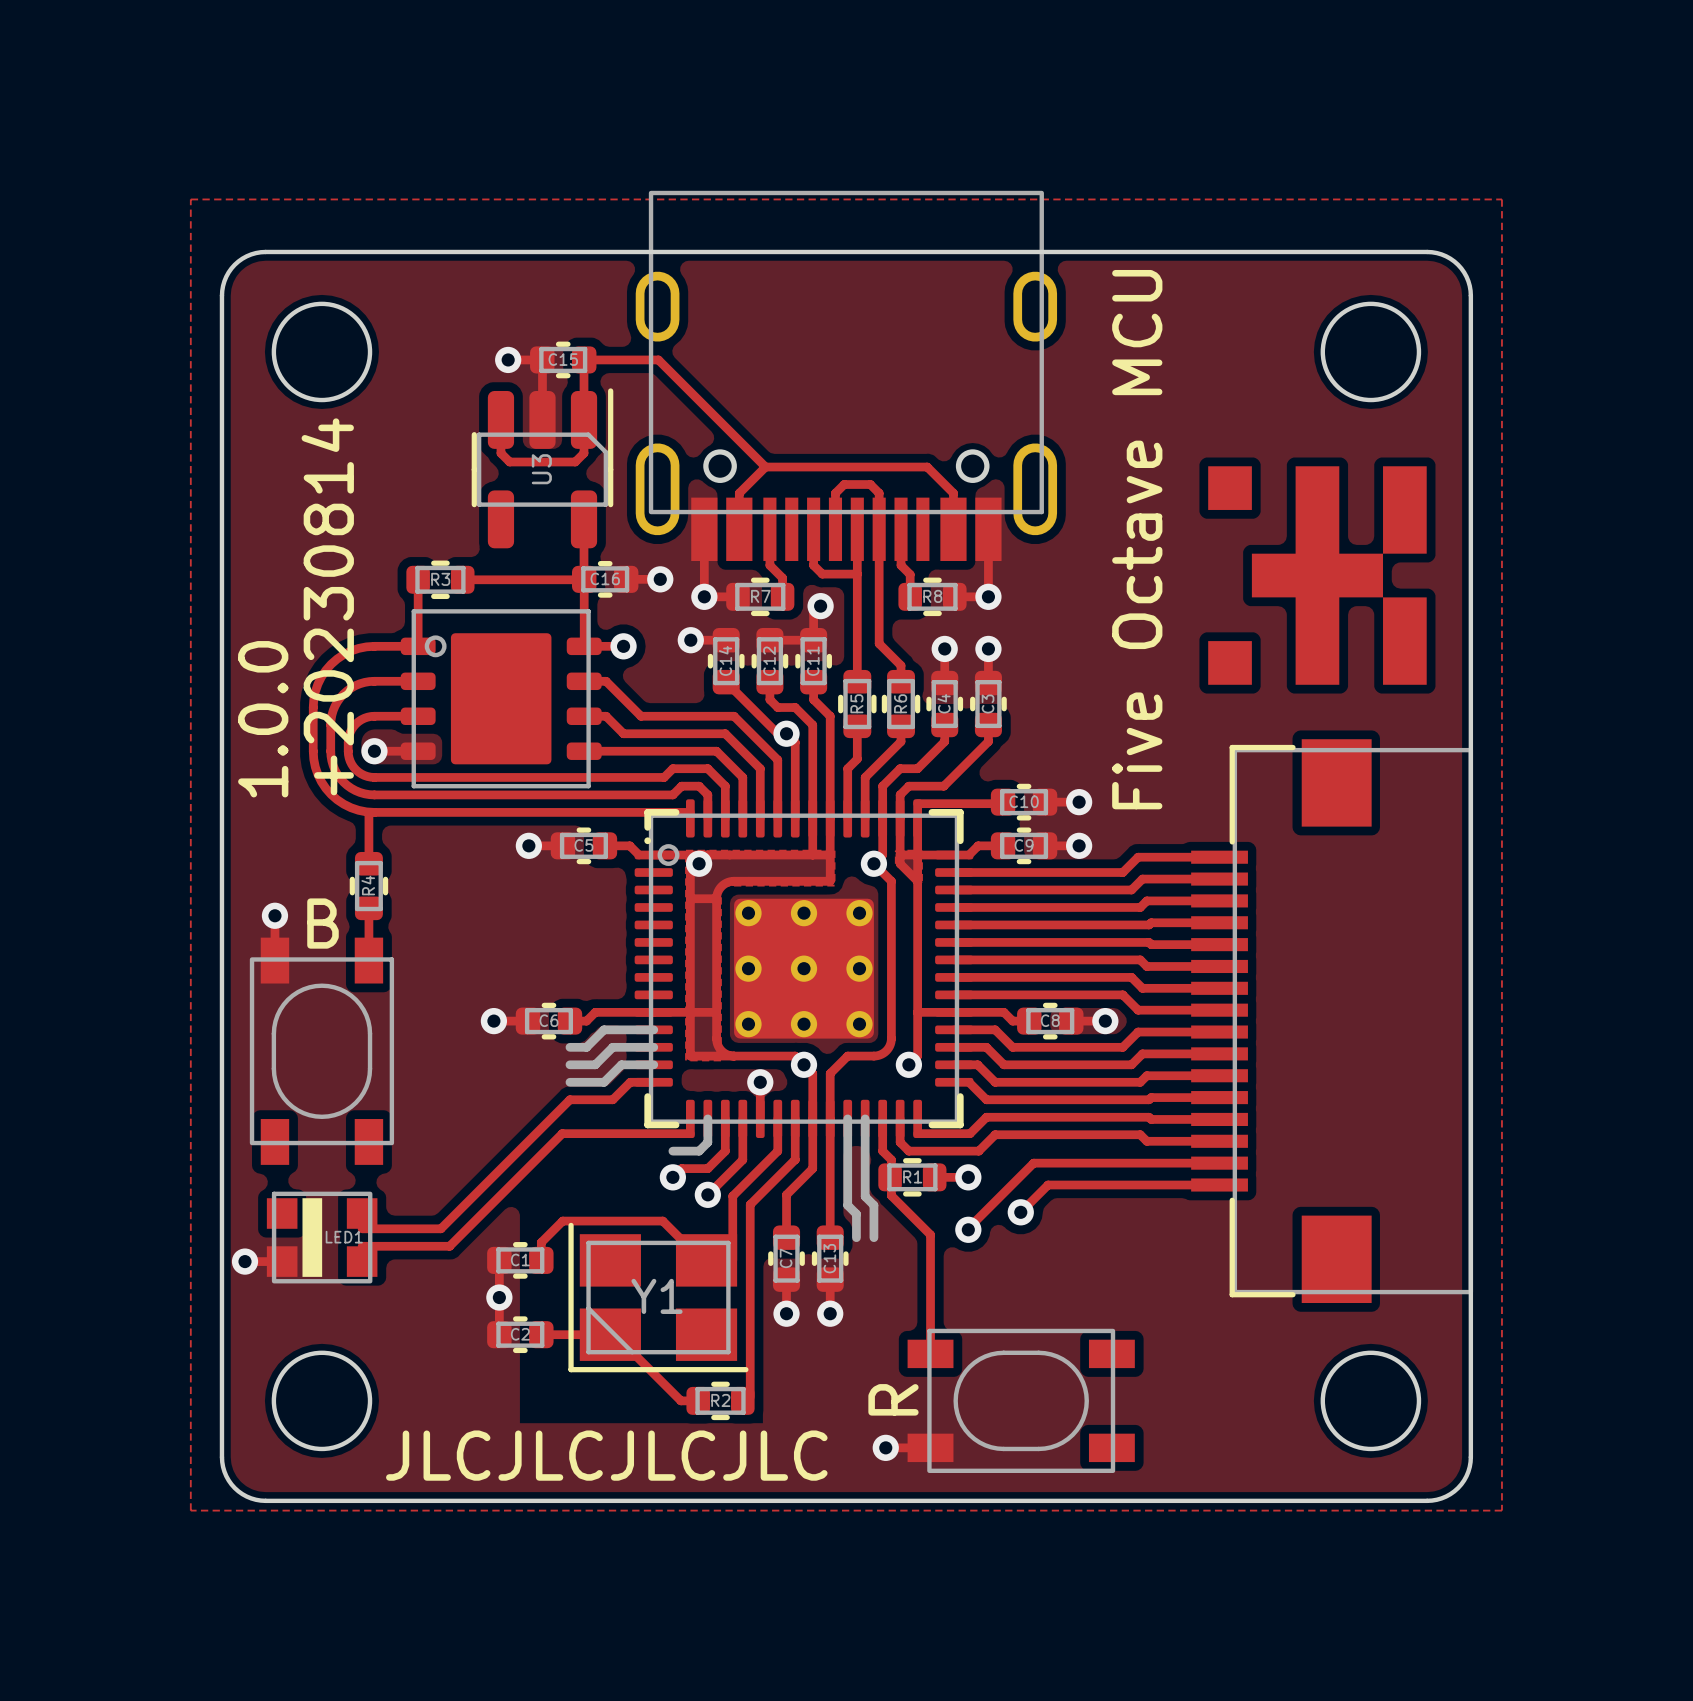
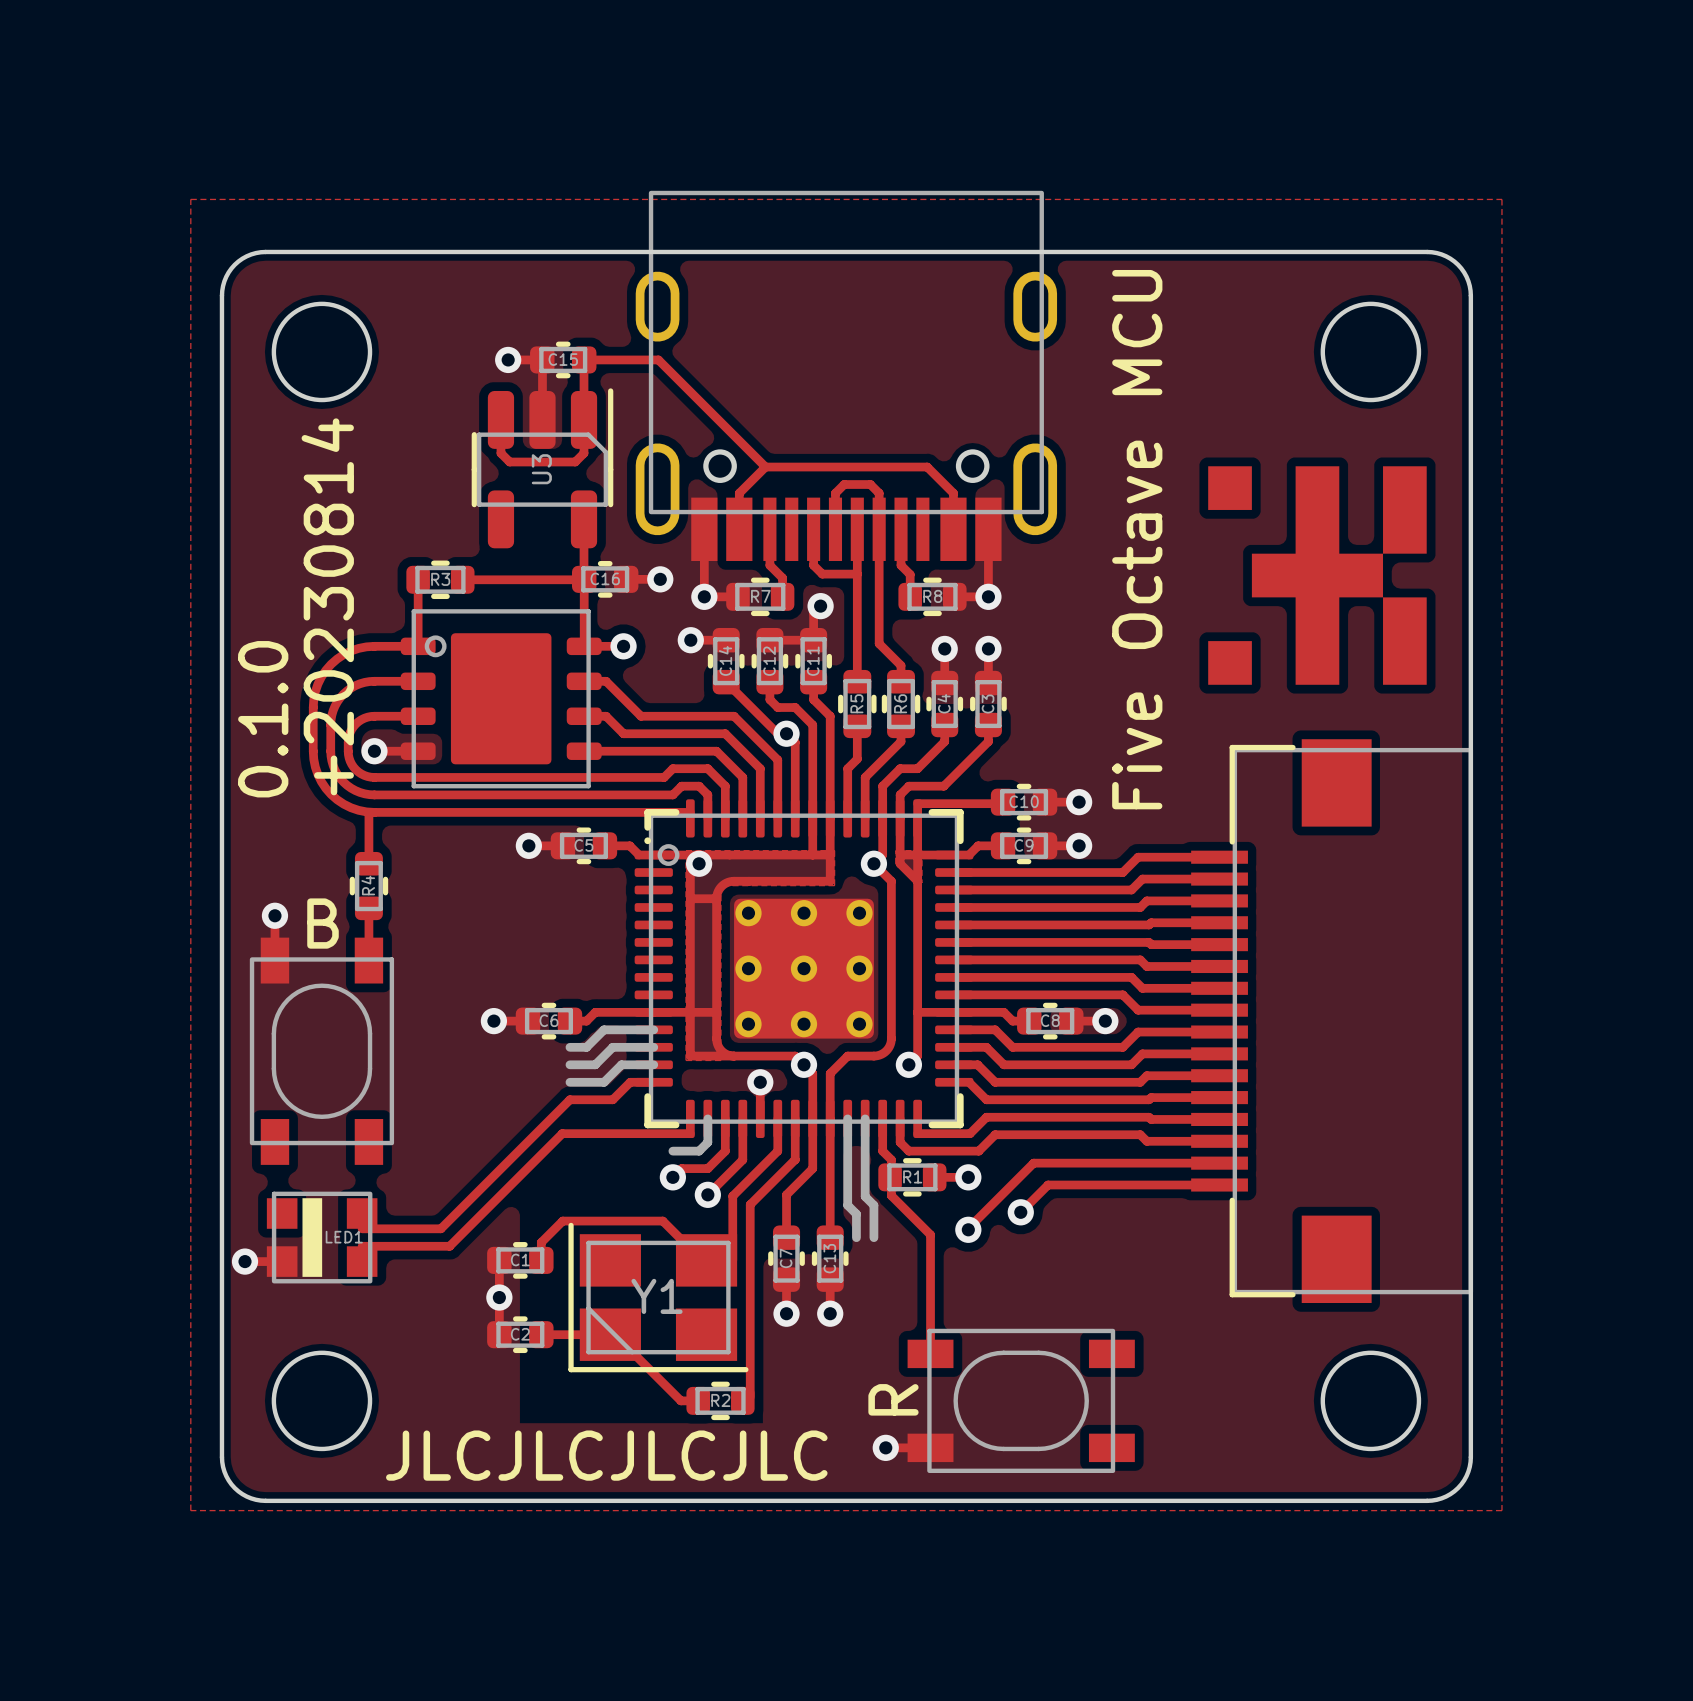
text: 1.0.0 (263, 719) -> 0.1.0 (263, 719)

